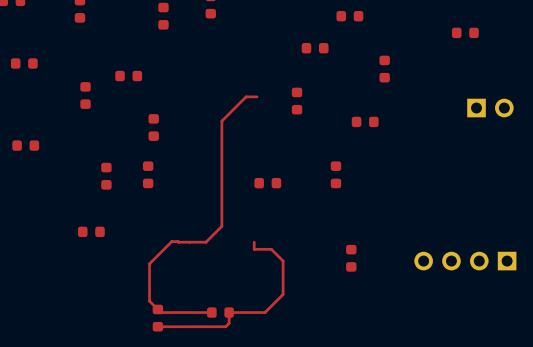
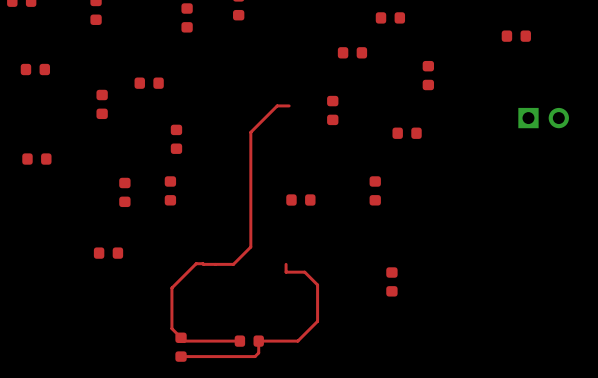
part: (465, 261) -> none

